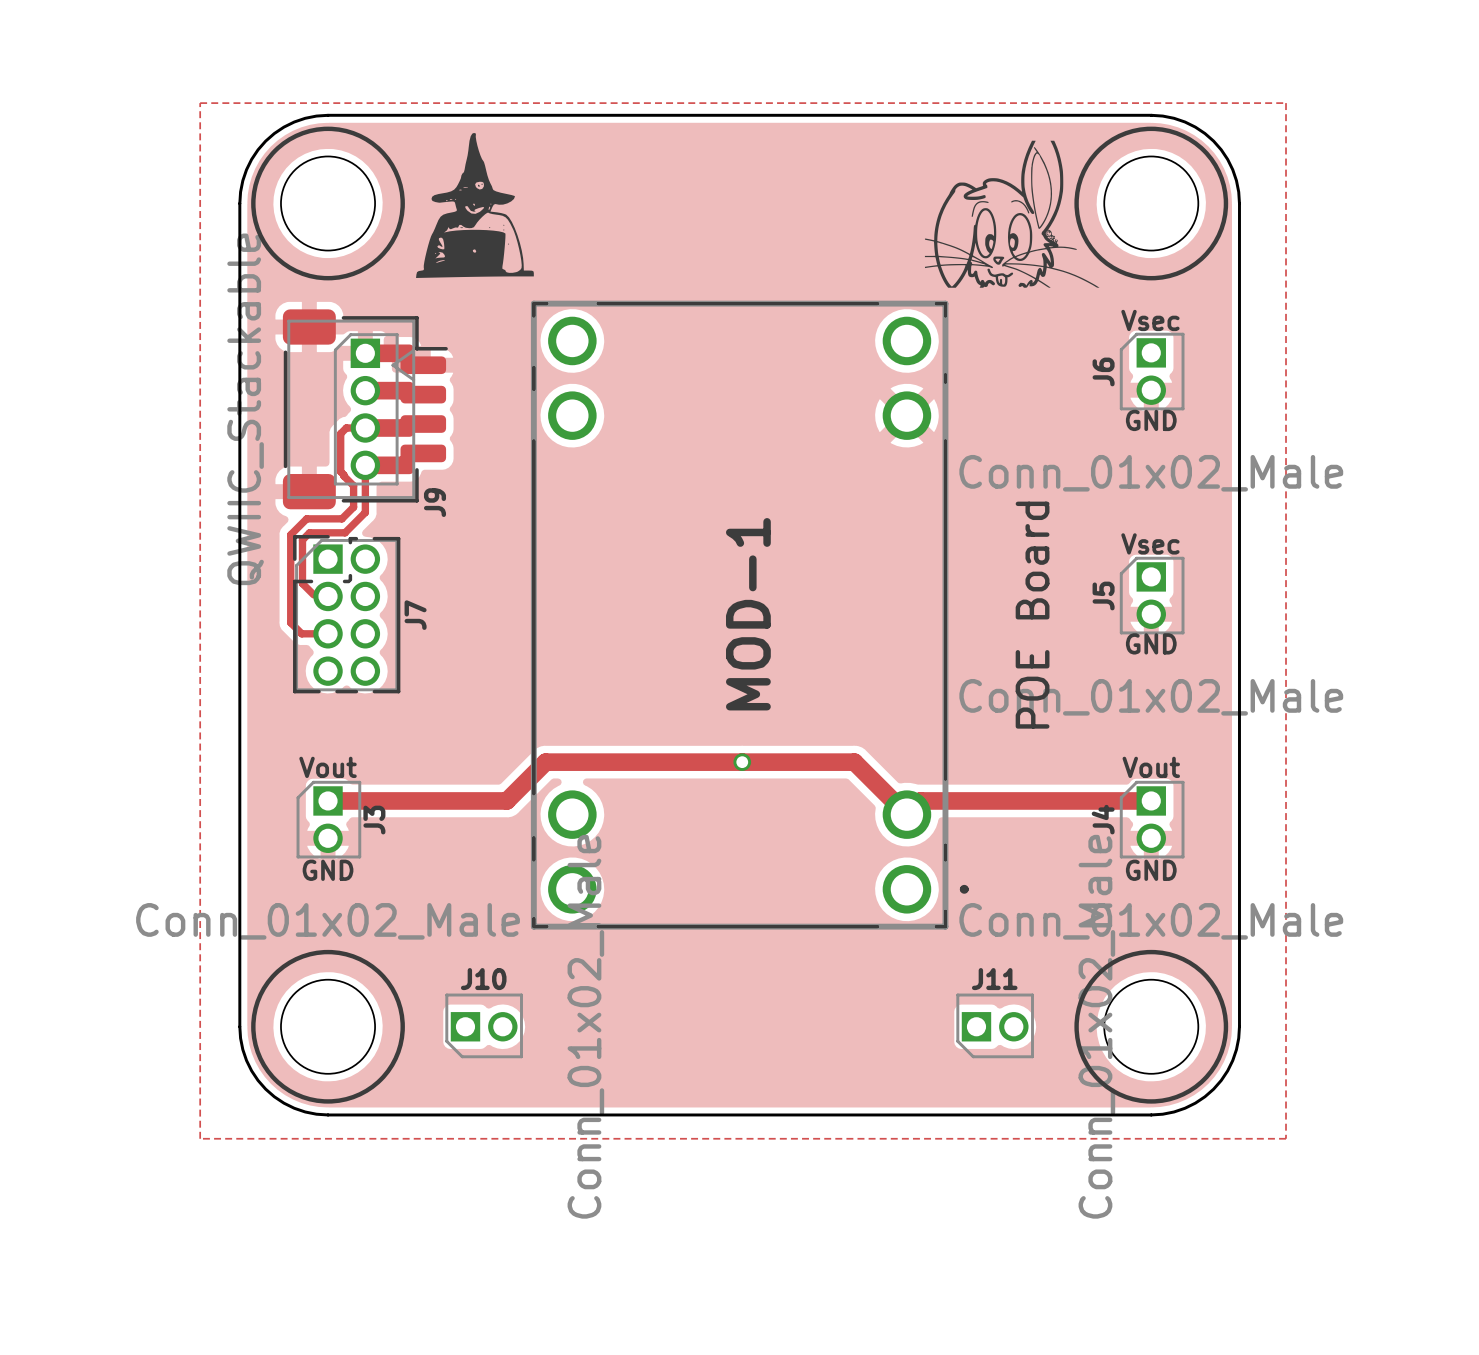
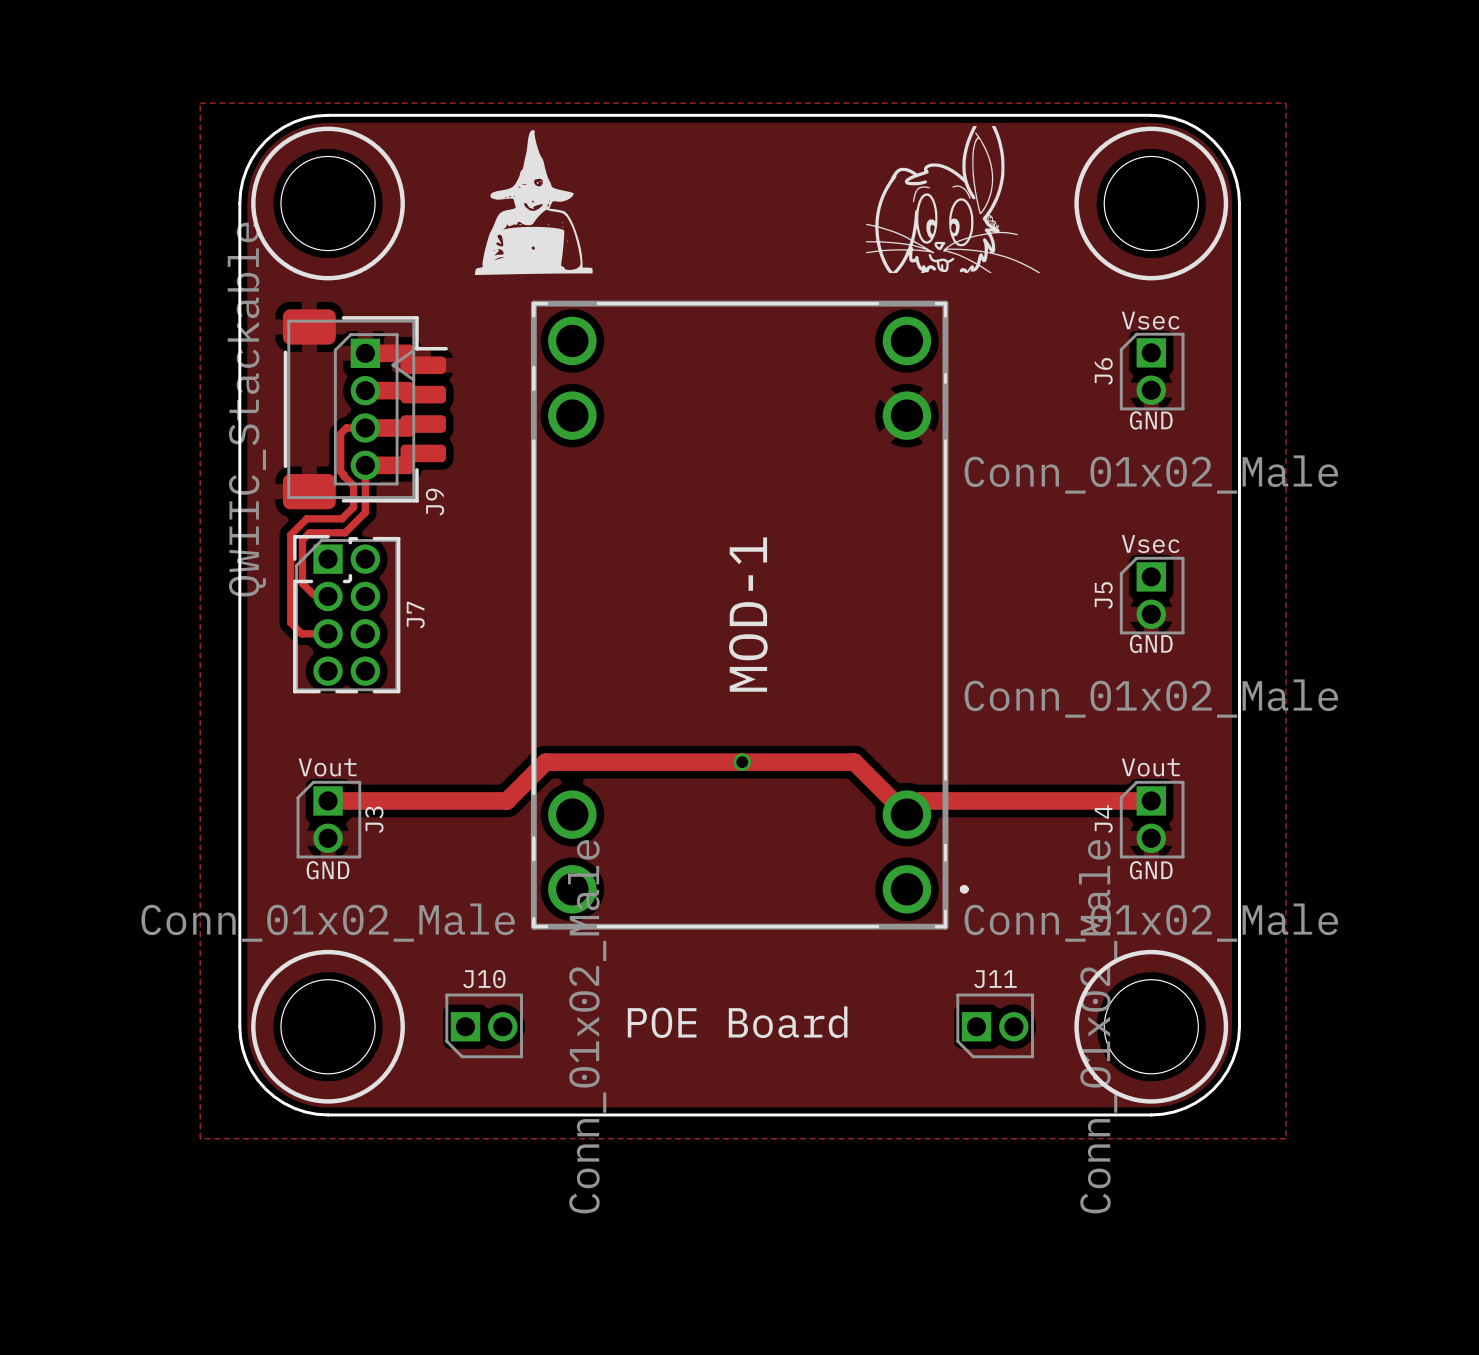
drawing position: (474, 205) -> (533, 202)
drawing position: (1012, 214) -> (953, 199)
text rotation: 0° (1032, 615) -> 90° clockwise (737, 1022)
text position: POE Board (1032, 615) -> POE Board (737, 1022)

